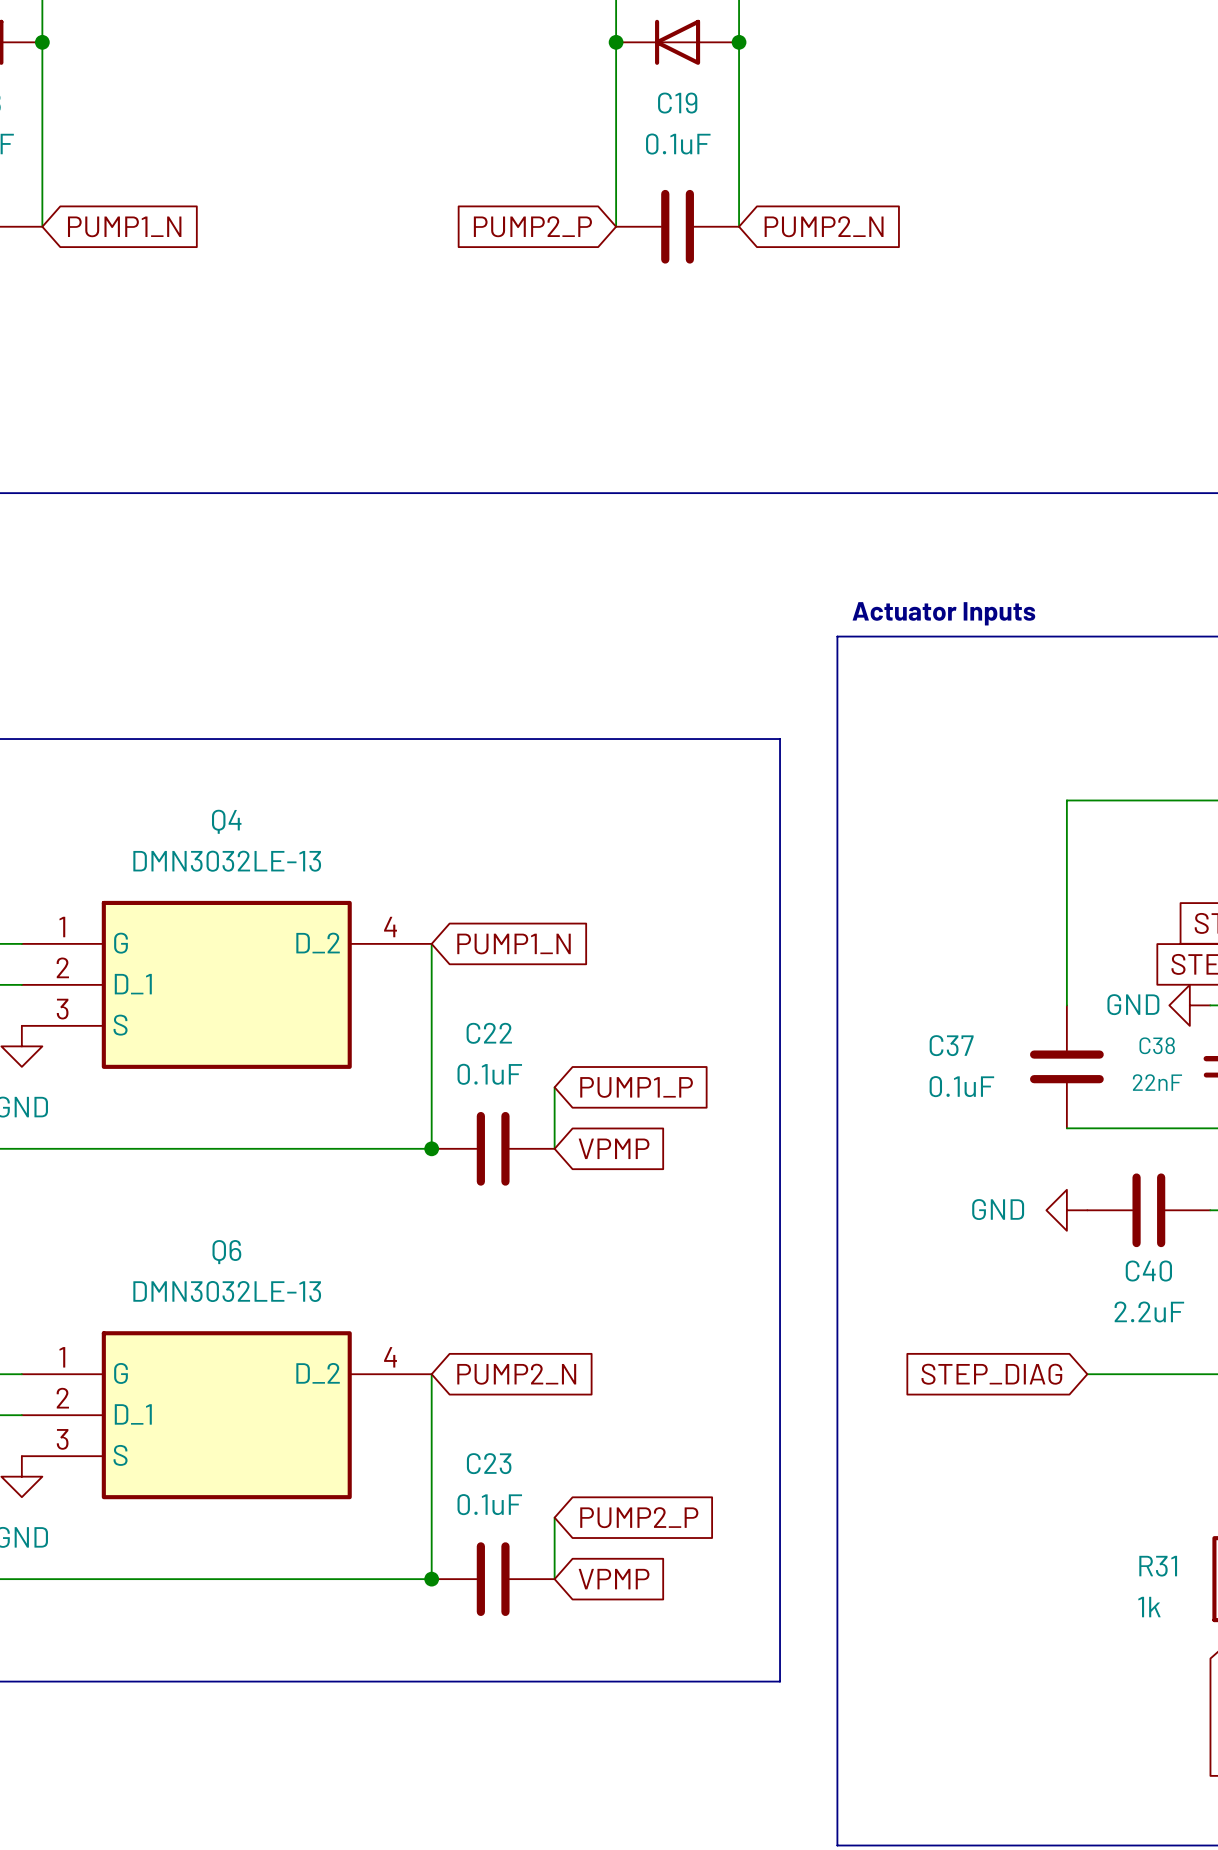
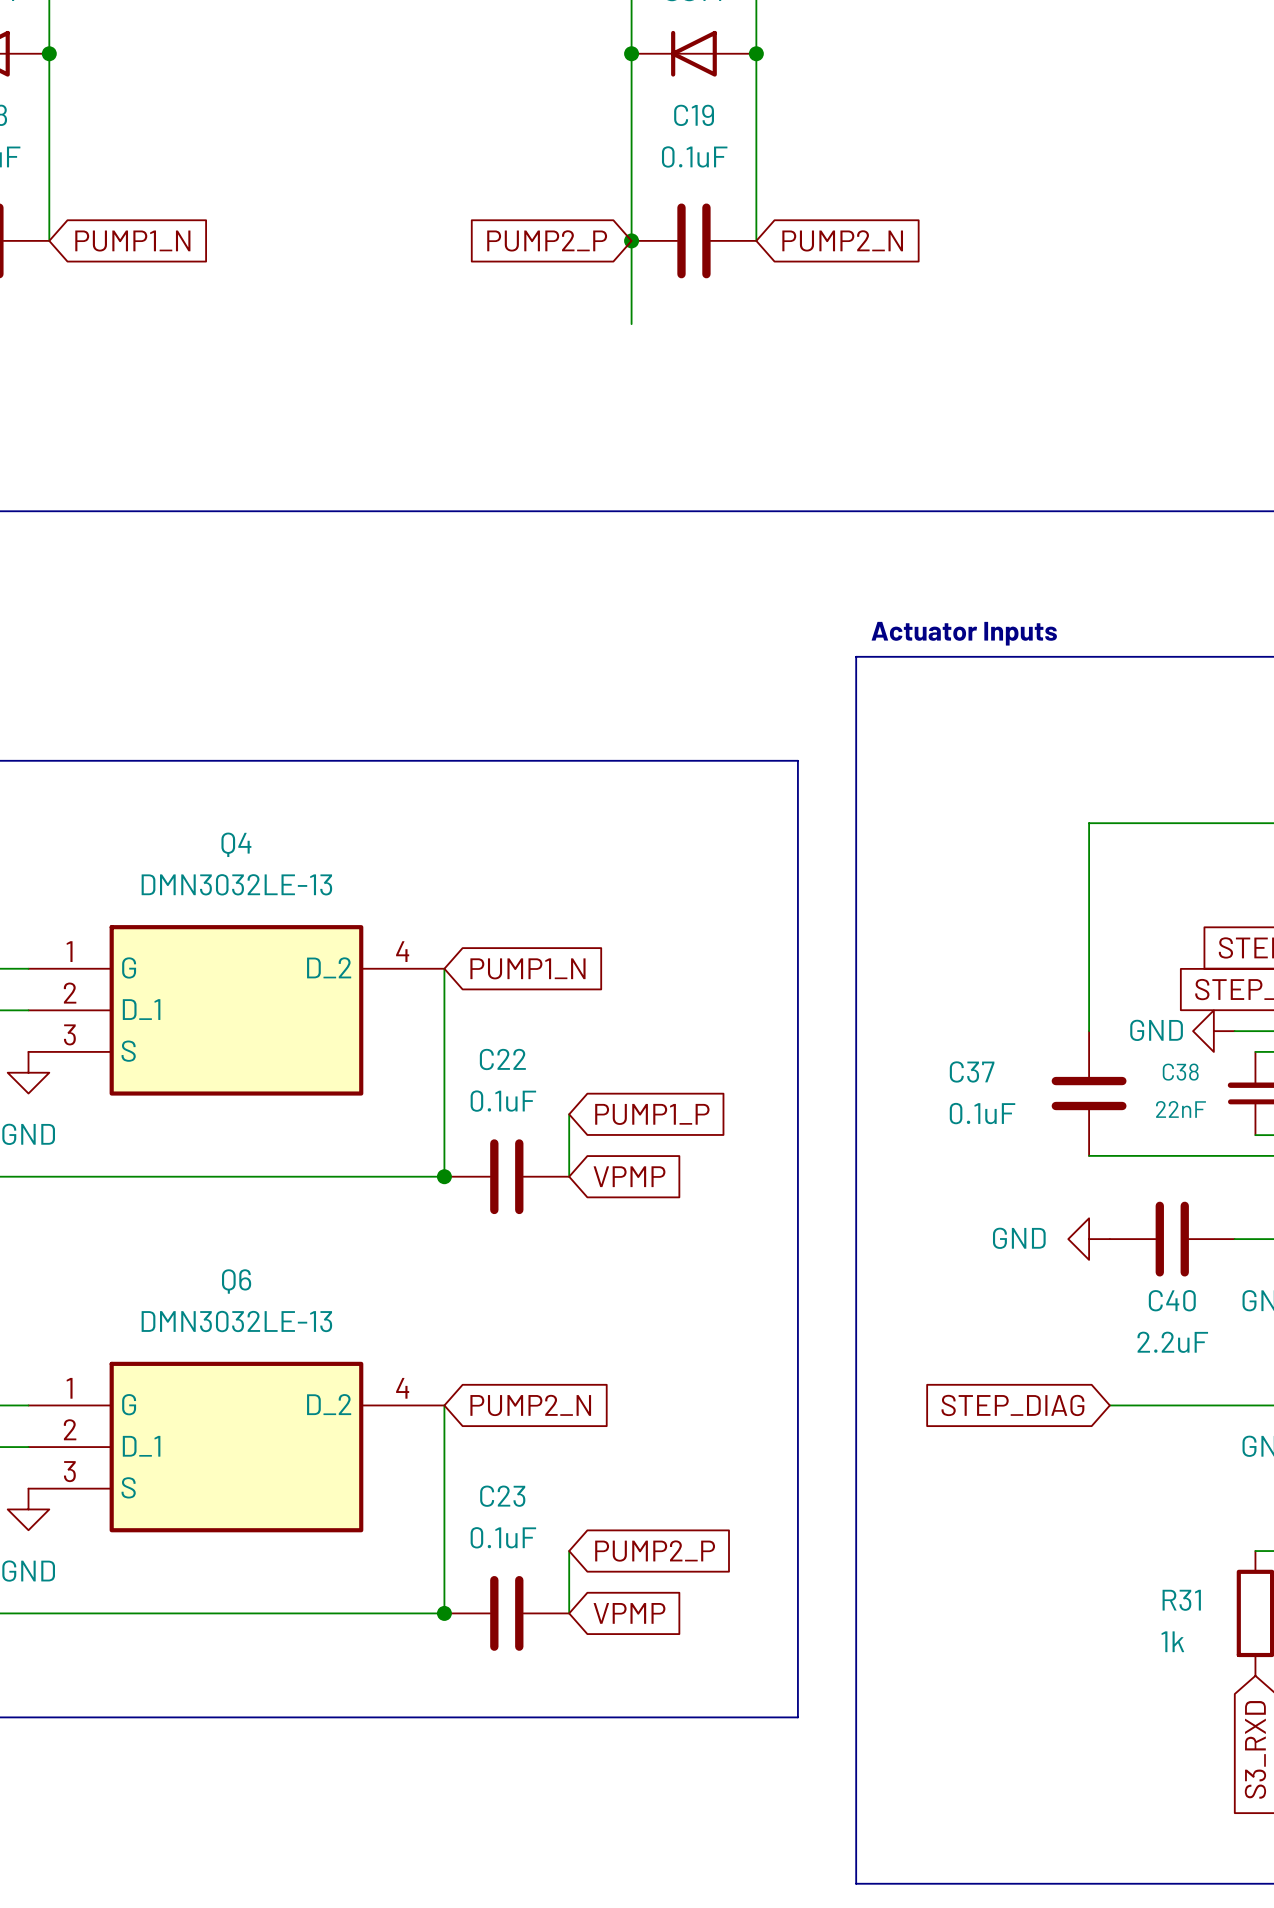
wire: none -> (631, 240) (631, 324)
junction: none -> (631, 240)

